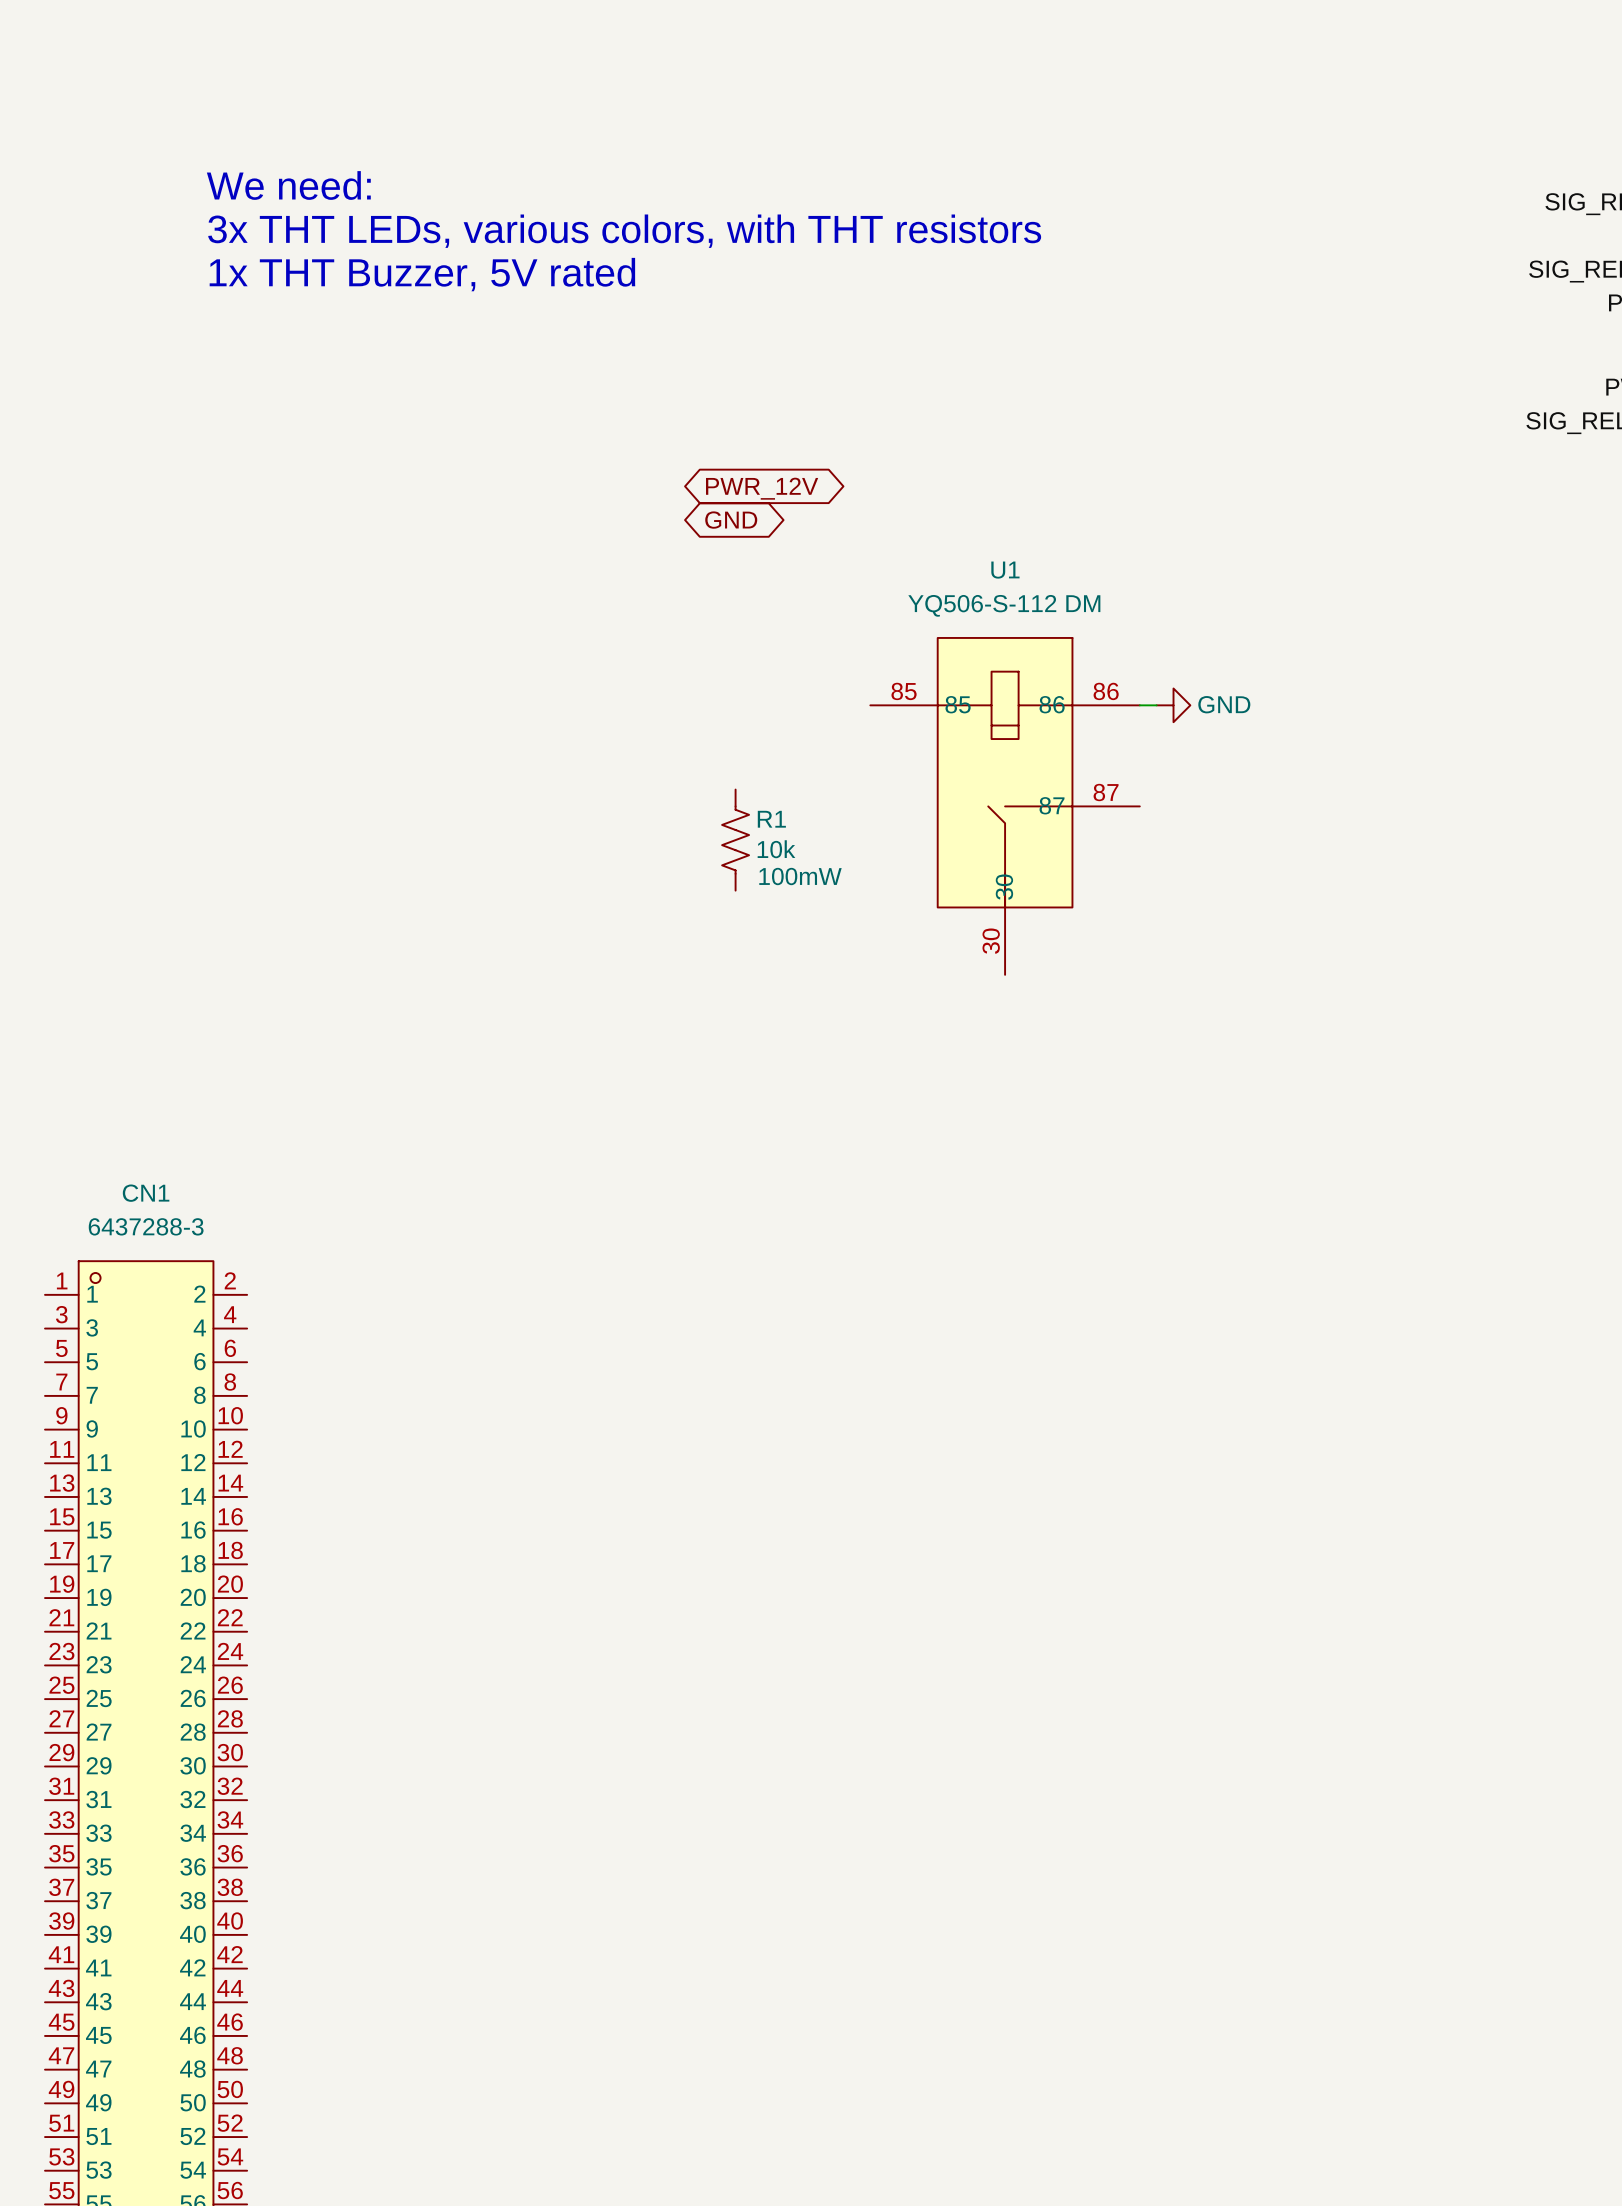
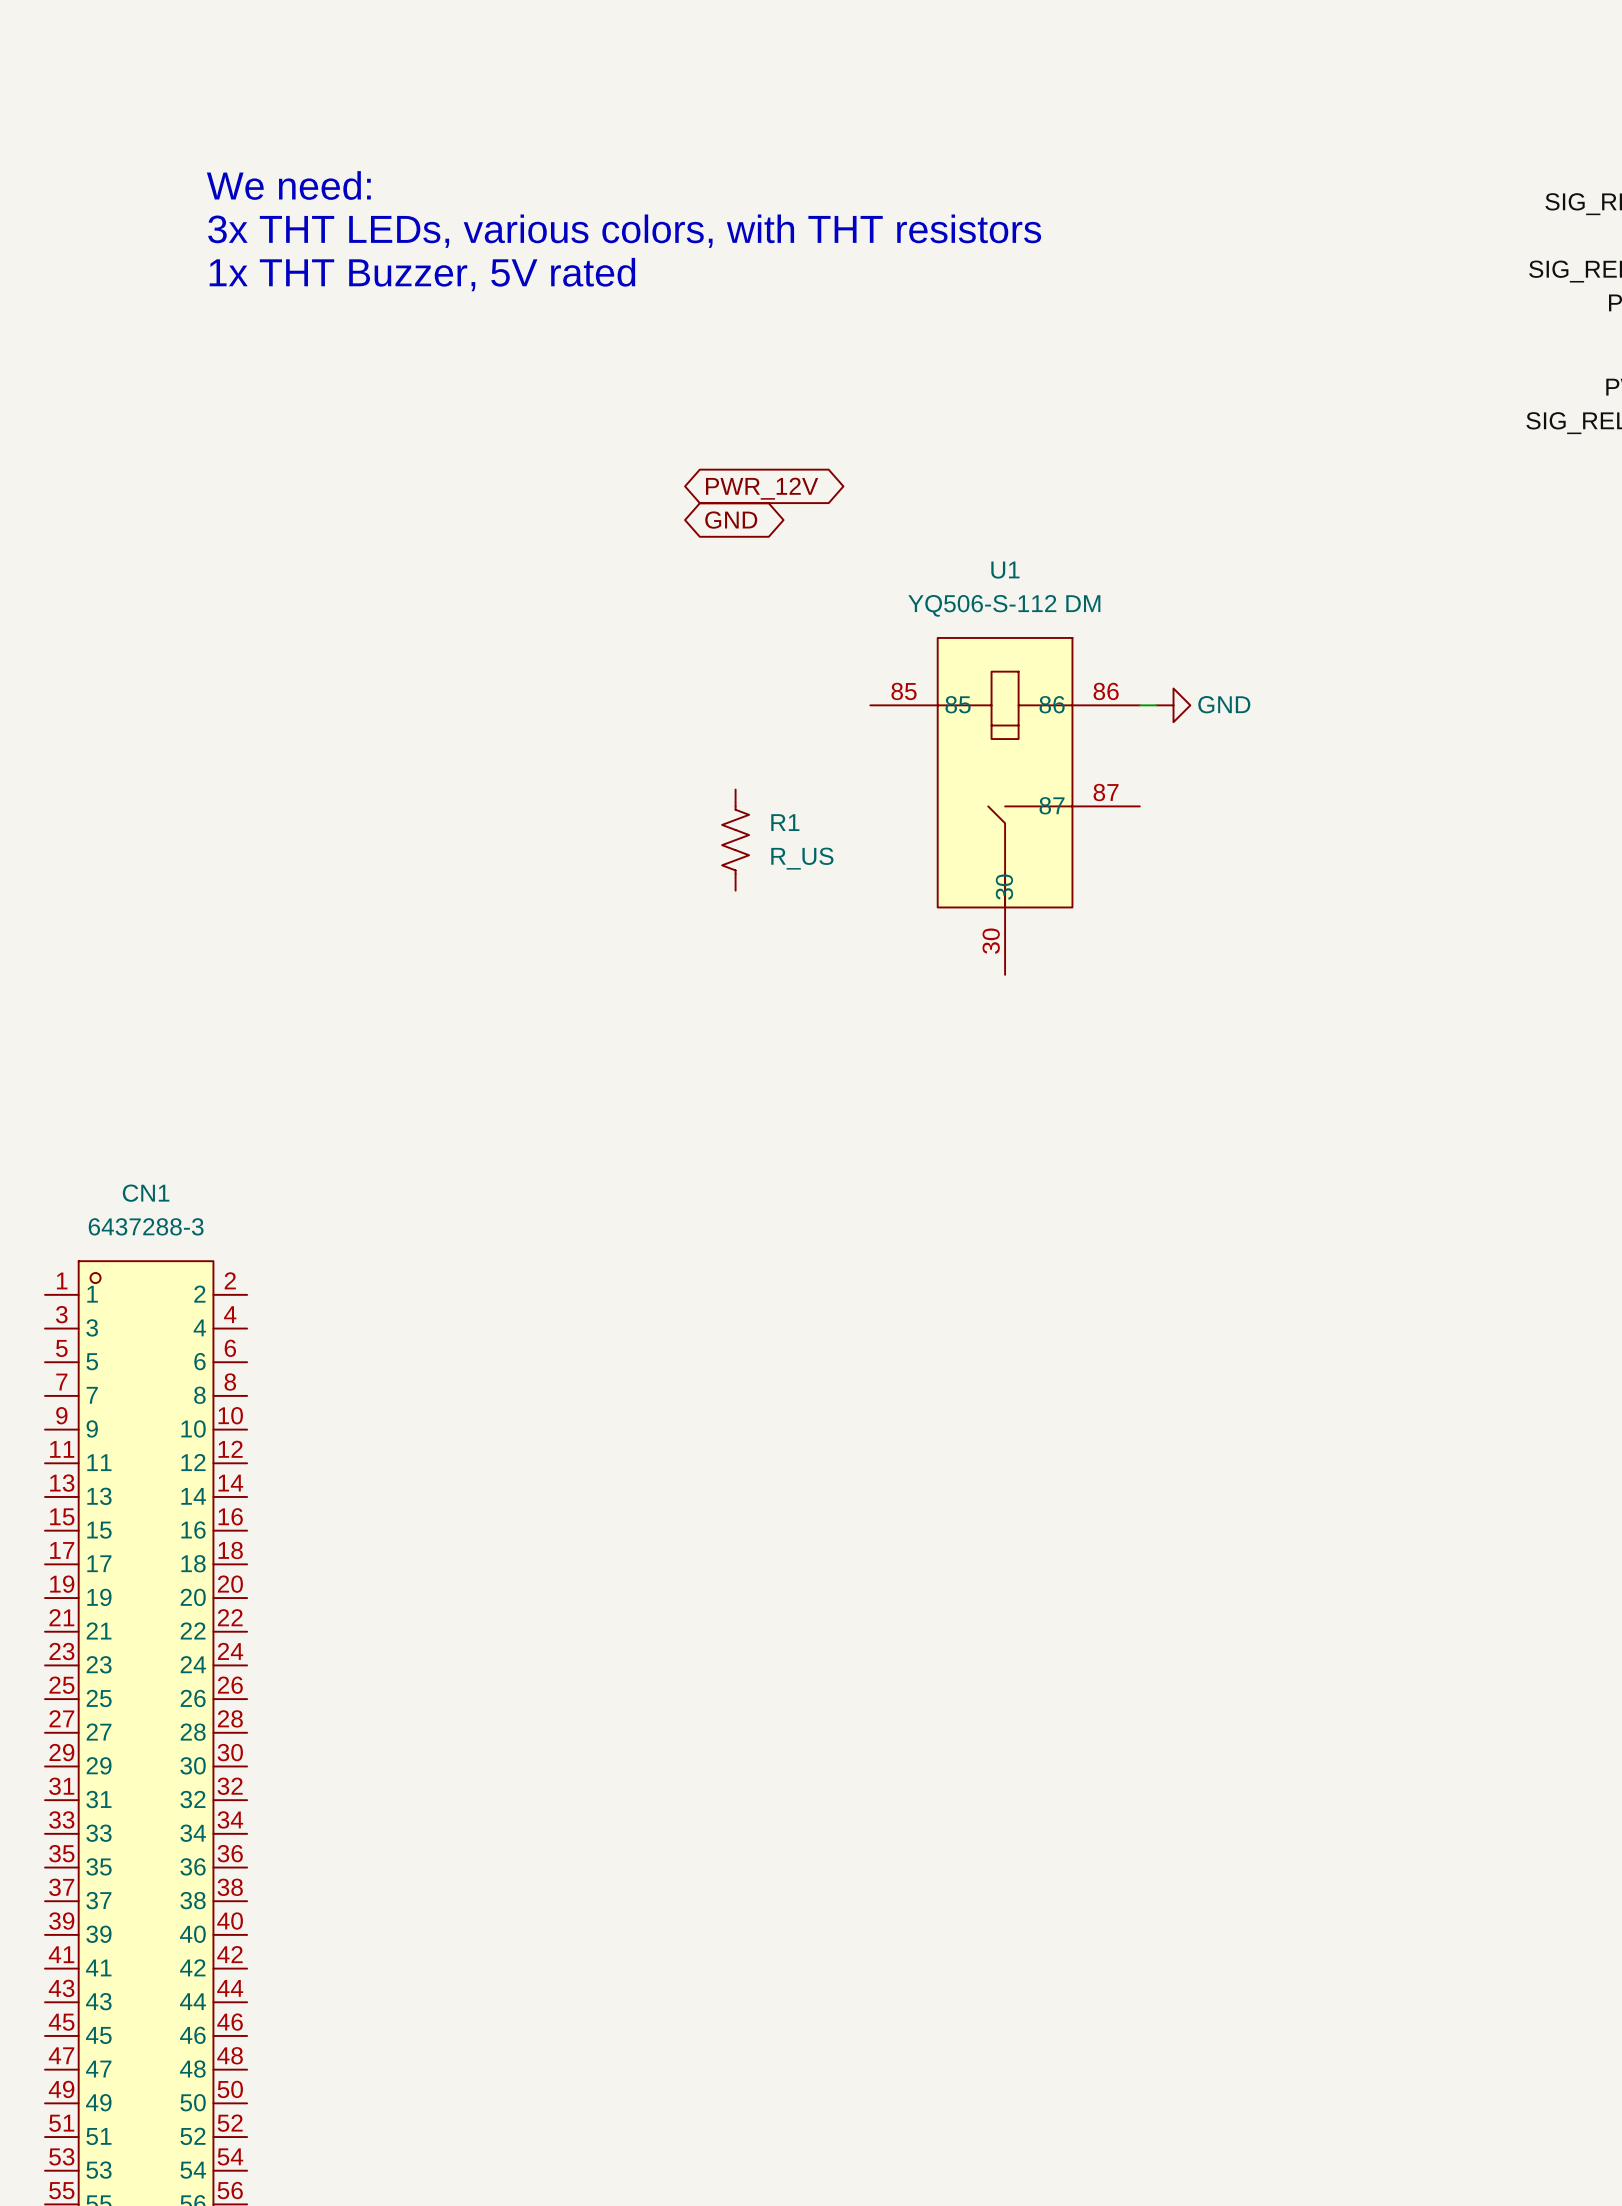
R1 name position: R1 (771, 819) -> R1 (785, 822)
R1 value: 10k (776, 849) -> R_US (802, 858)
R1 text: 100mW (800, 876) -> none

